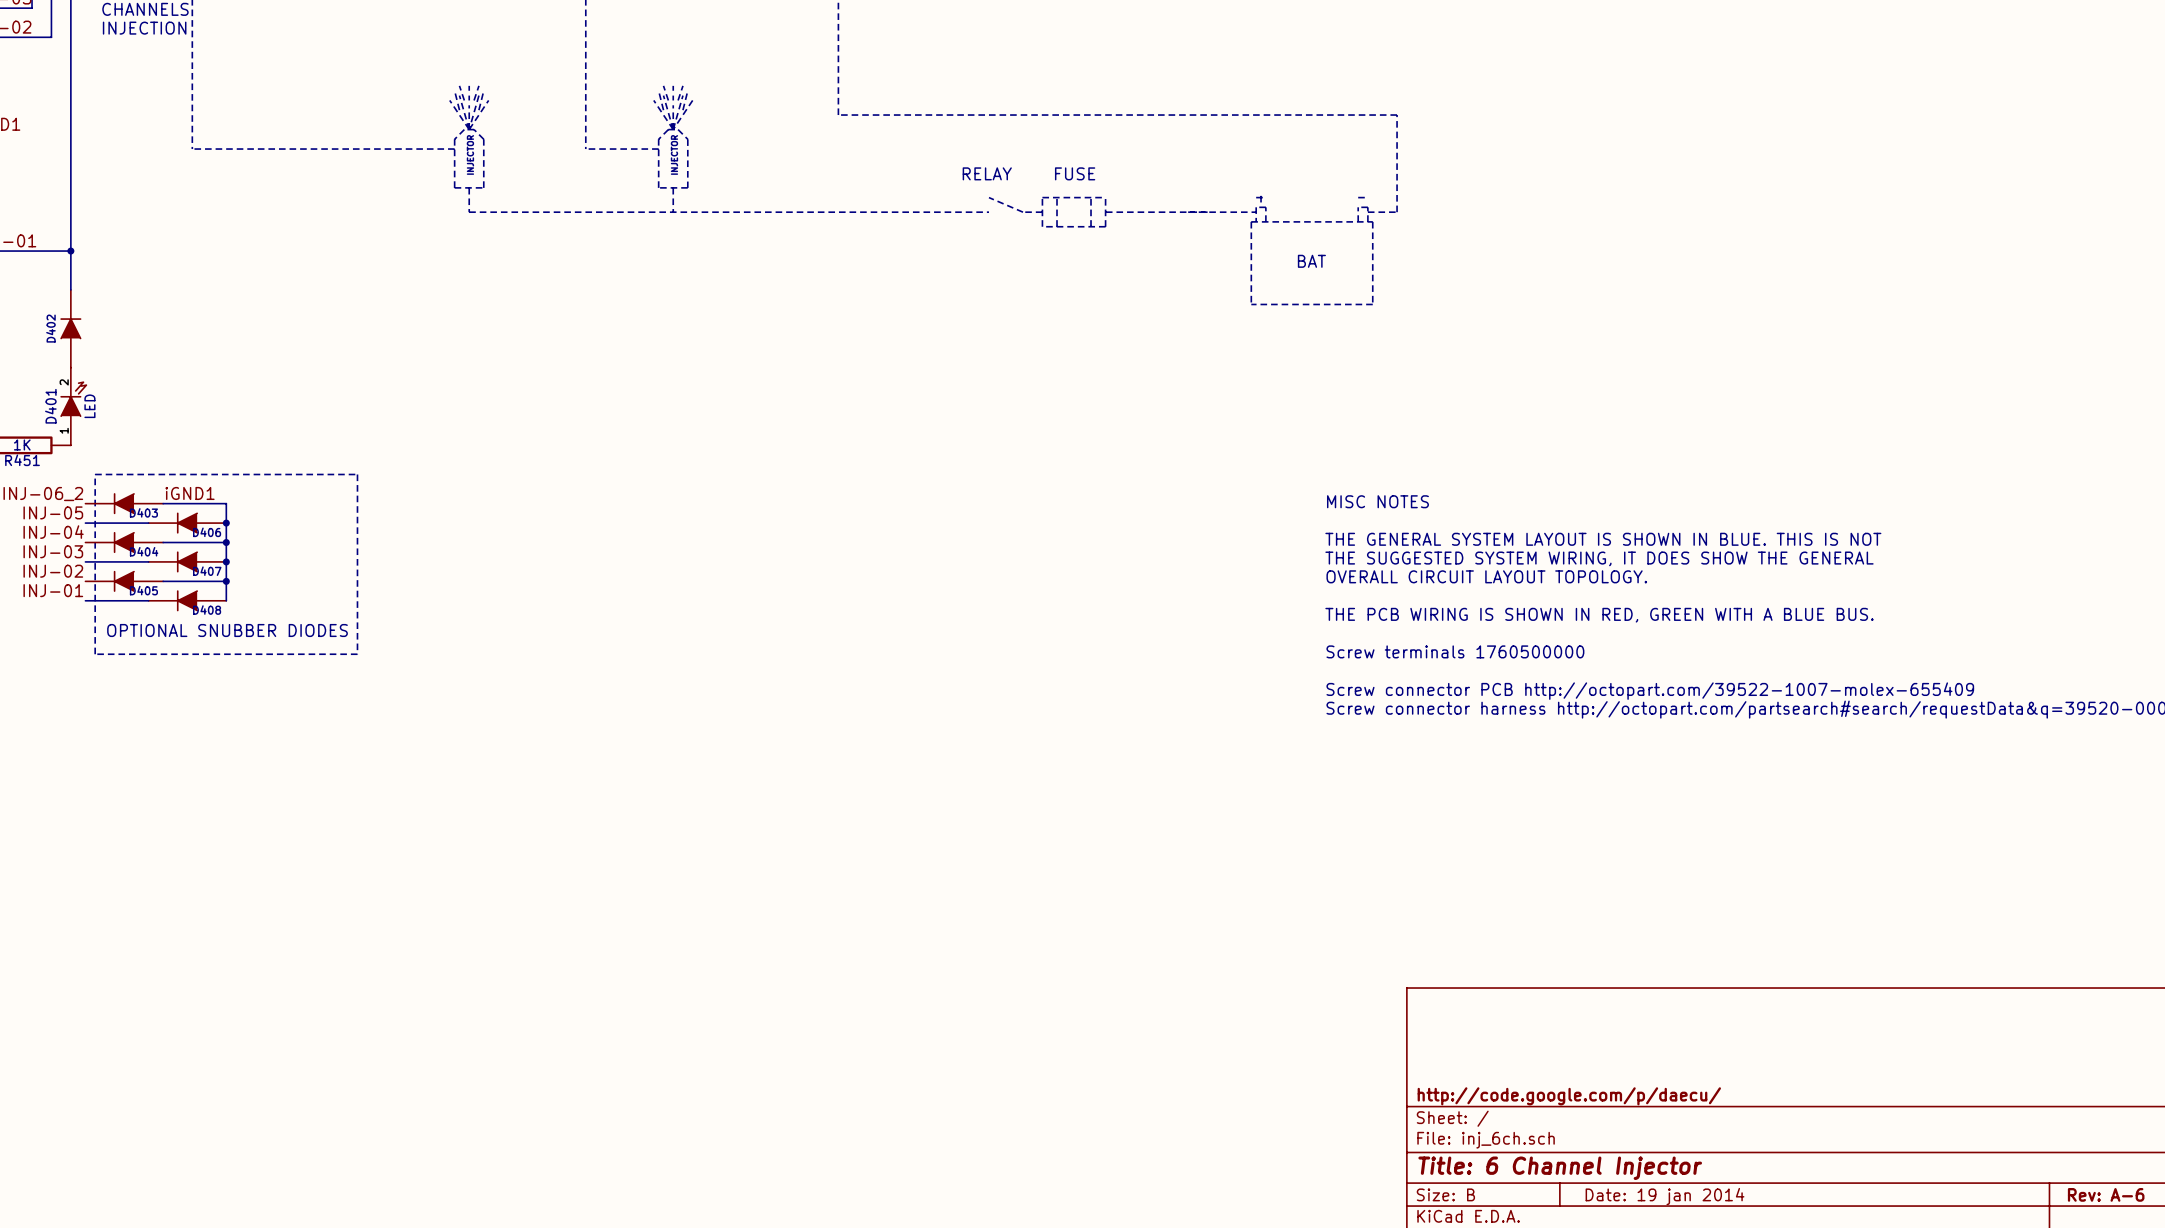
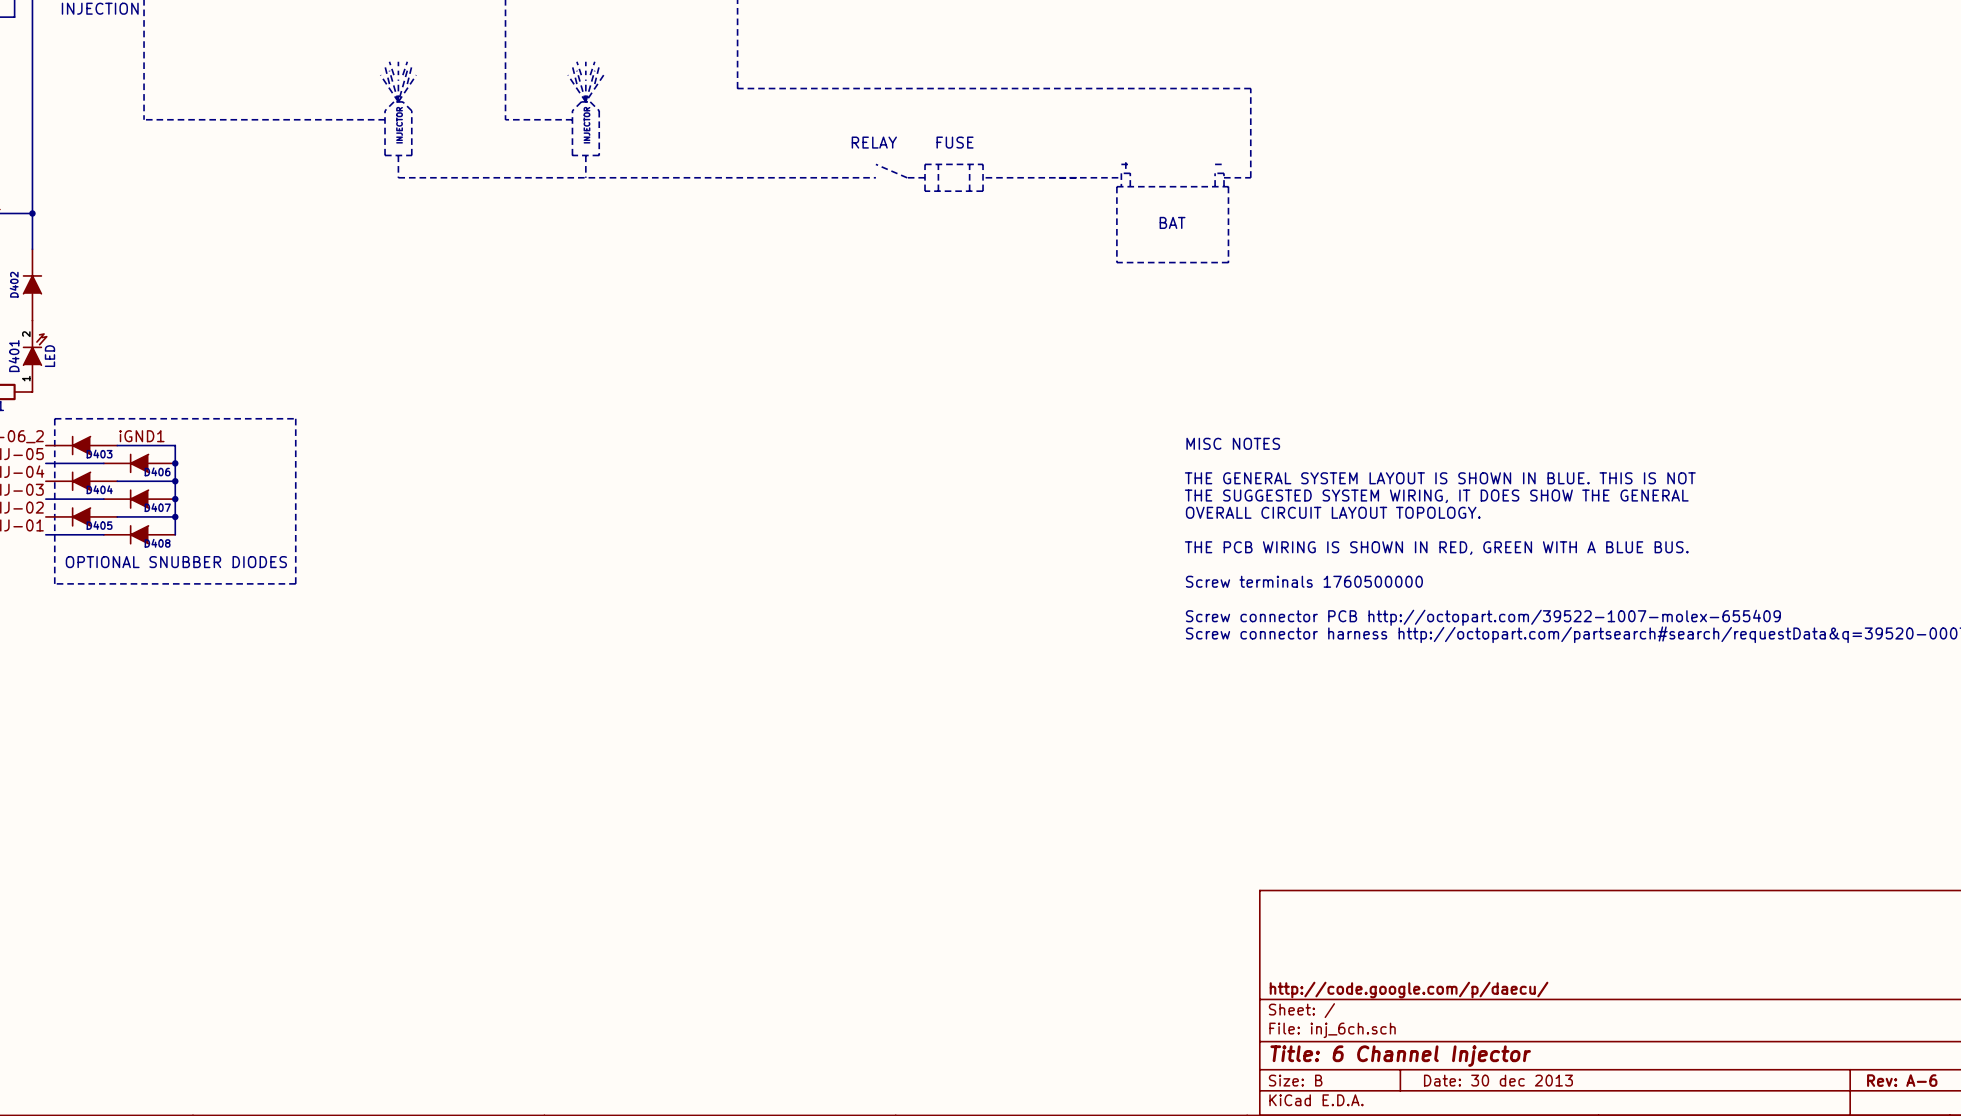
title block: Date: 19 jan 2014 (1665, 1196) -> Date: 30 dec 2013 (1498, 1080)

